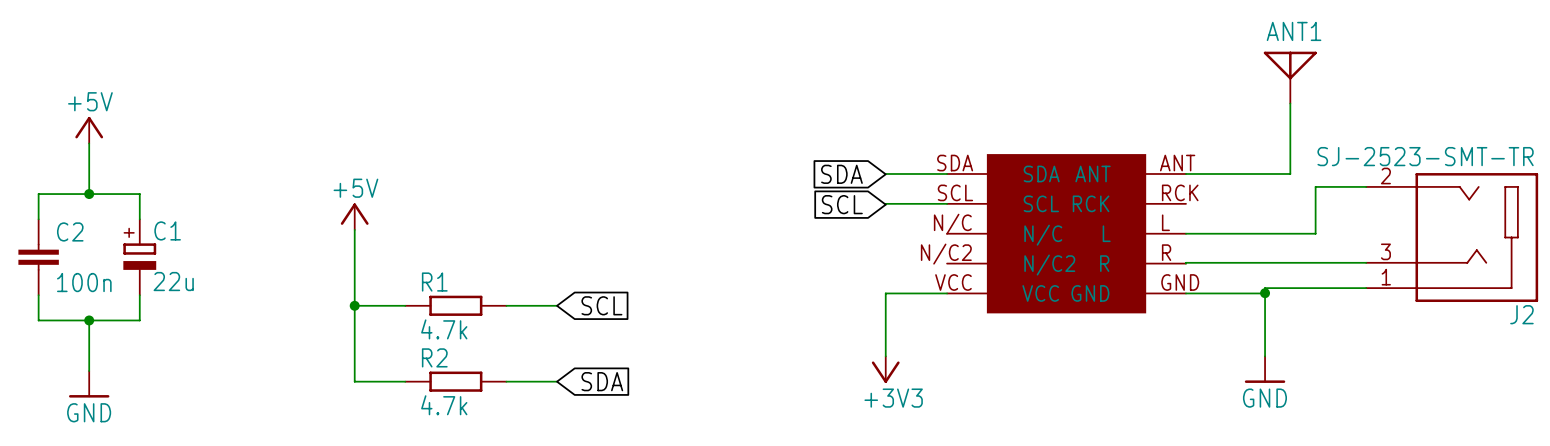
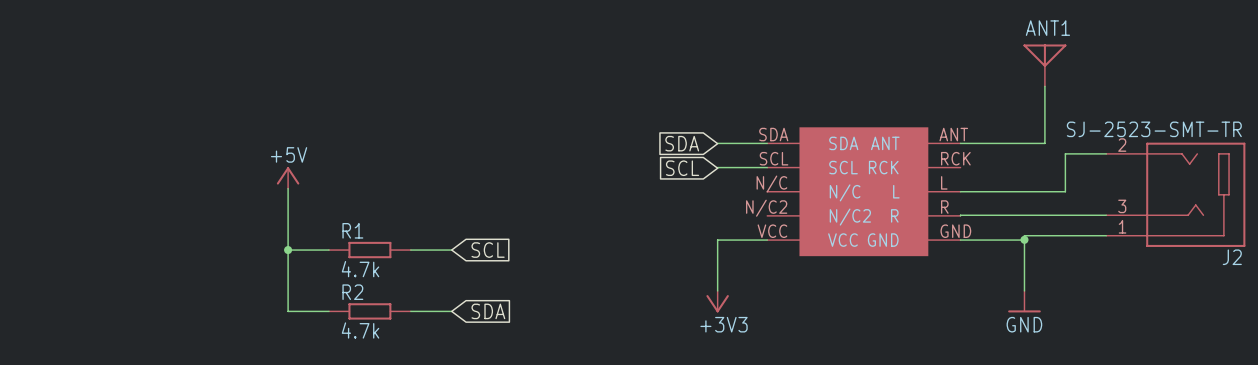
power symbol: +5V (89, 130) -> none
wire: (89, 143) (89, 194) -> none
junction: (89, 194) -> none
wire: (38, 219) (38, 194) (139, 194) (139, 219) -> none
C2: 100n (38, 257) -> none
C1: 22u (139, 257) -> none
wire: (38, 295) (38, 320) (139, 320) (139, 295) -> none
wire: (89, 320) (89, 371) -> none
junction: (89, 320) -> none
power symbol: GND (89, 384) -> none

